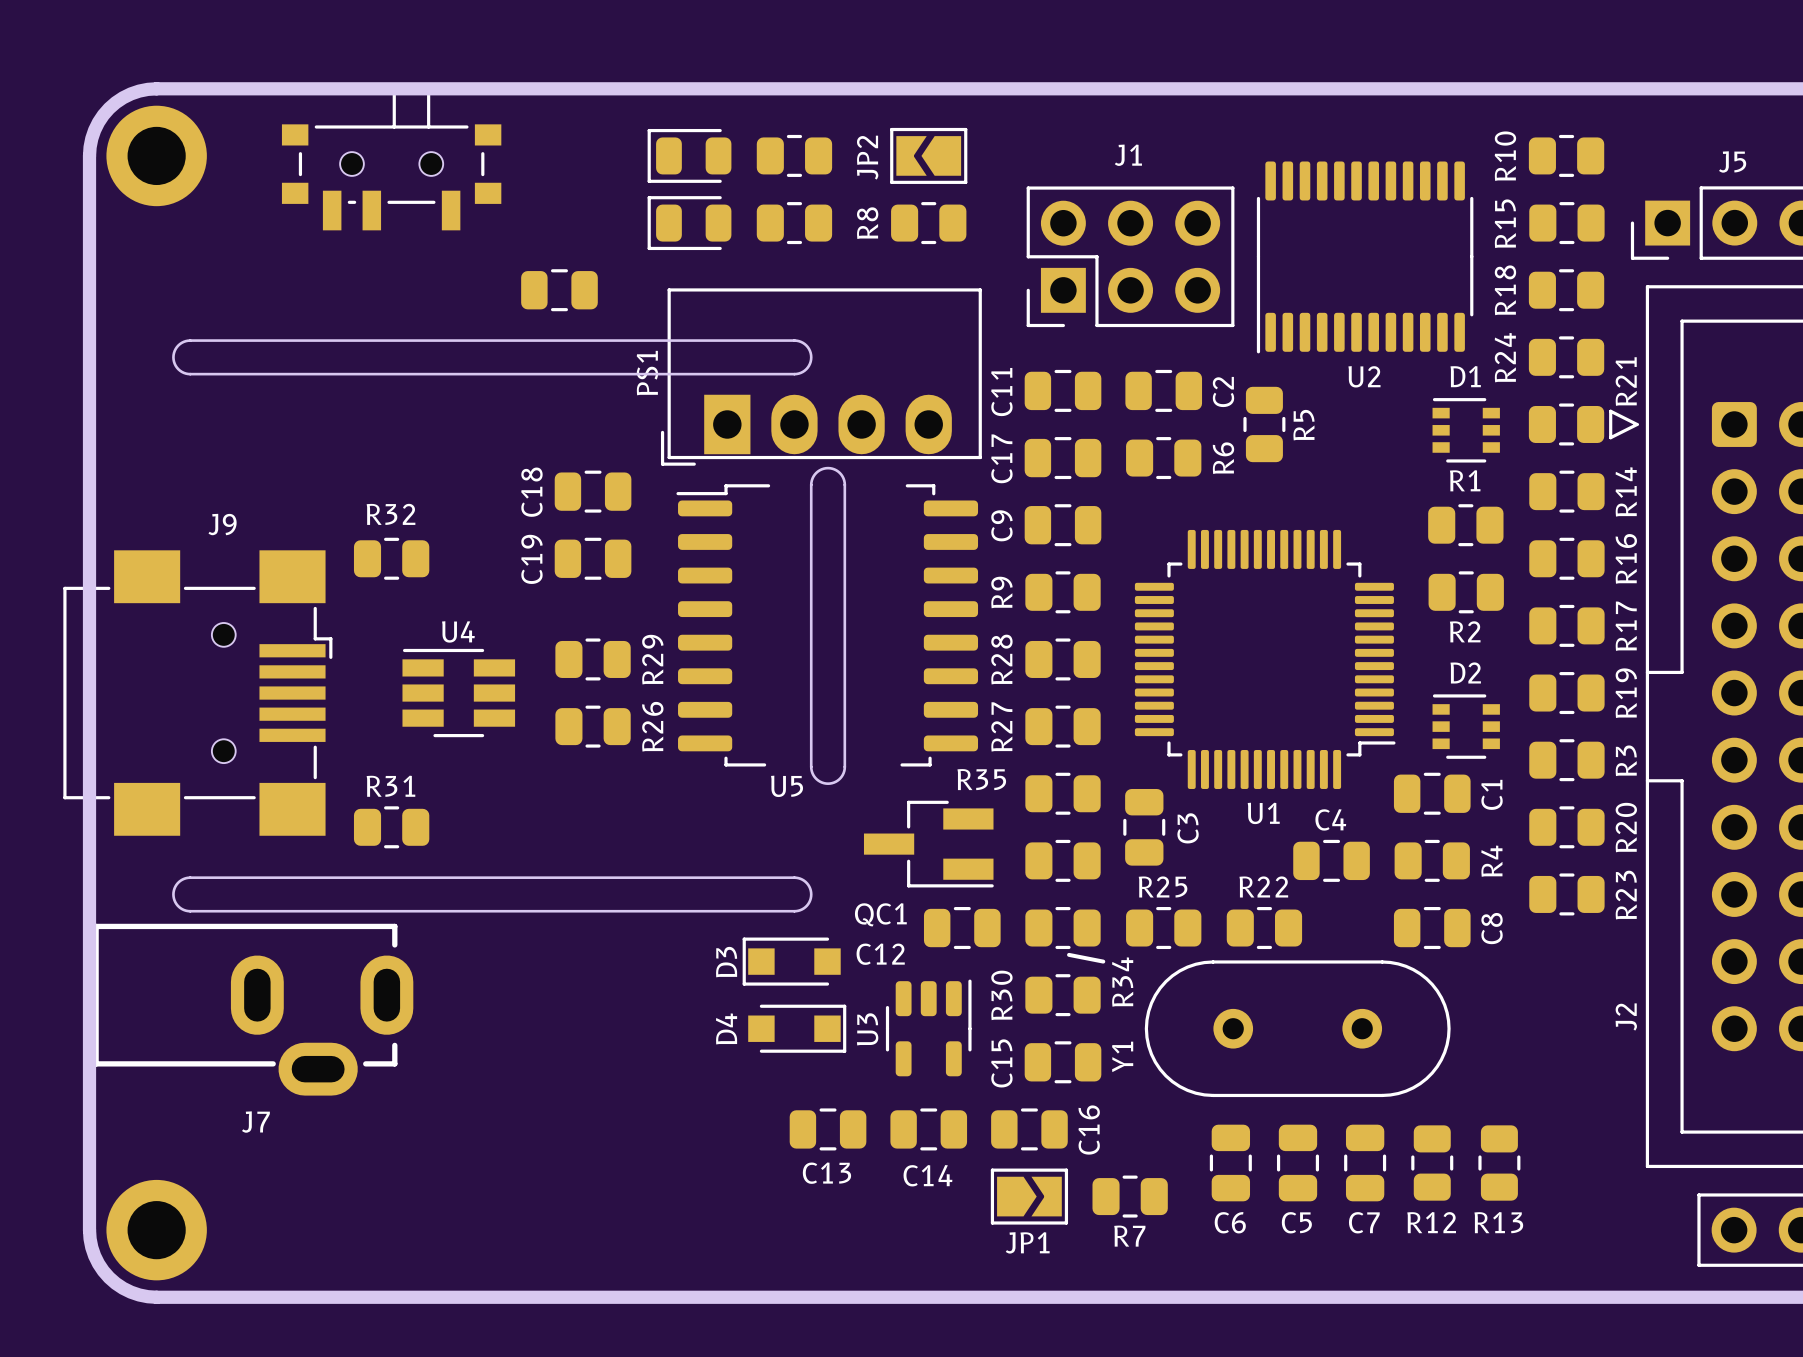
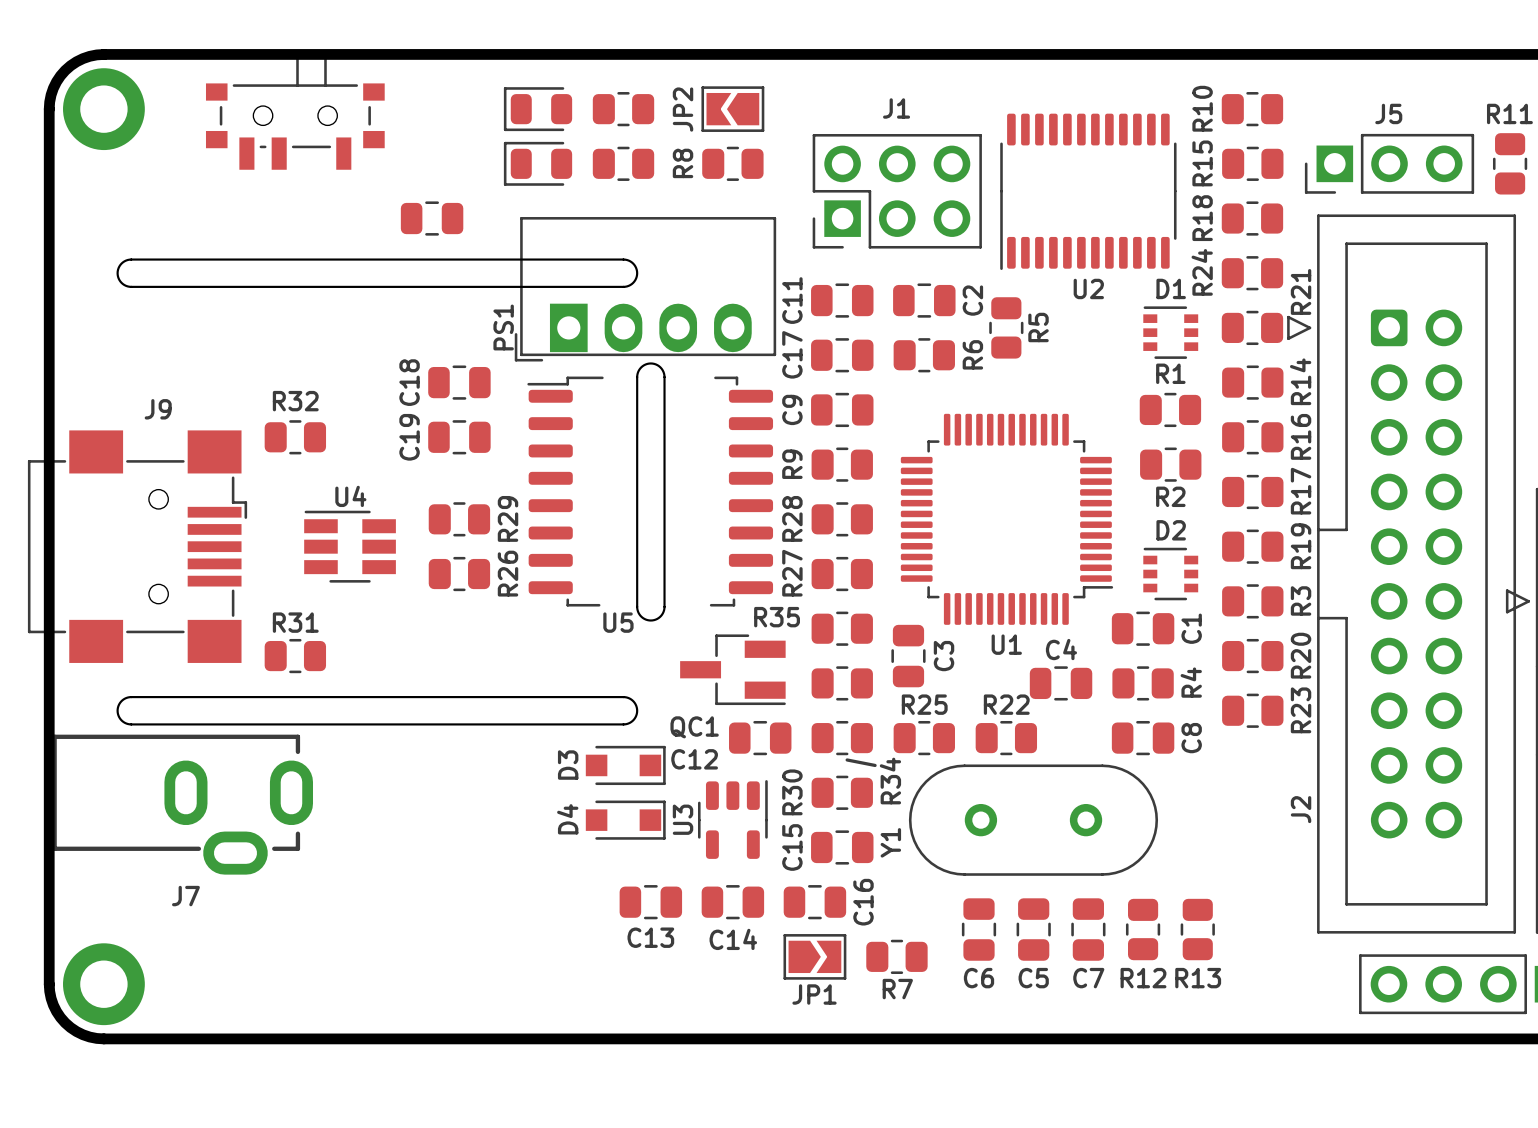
PS1 name position: PS1 (647, 373) -> PS1 (503, 327)
D3 rotation: 0° (791, 961) -> 180° (625, 765)

